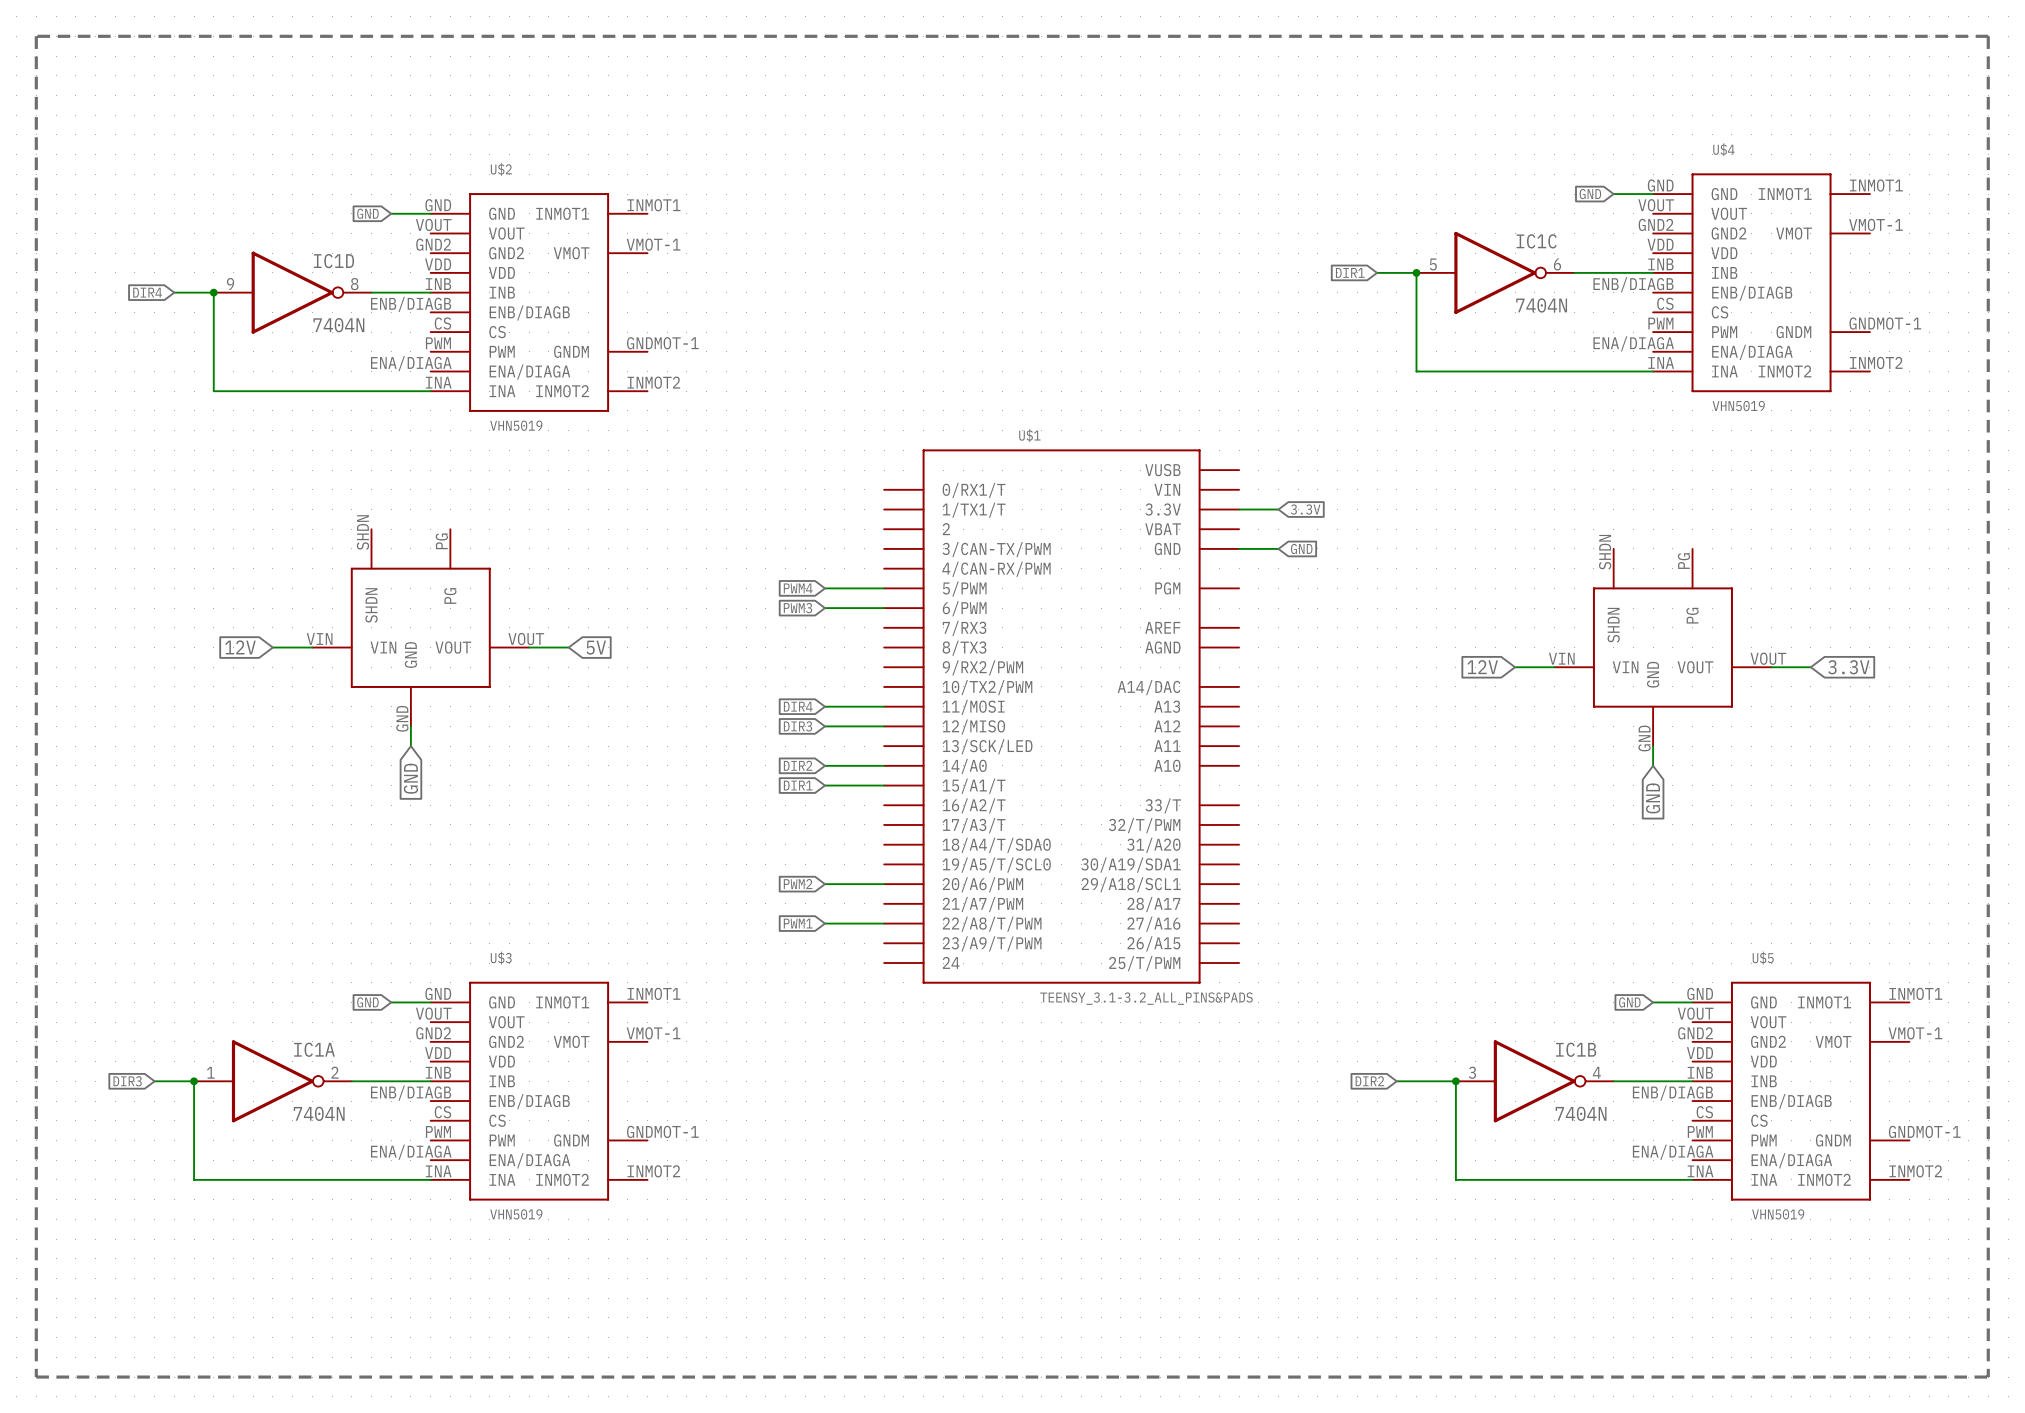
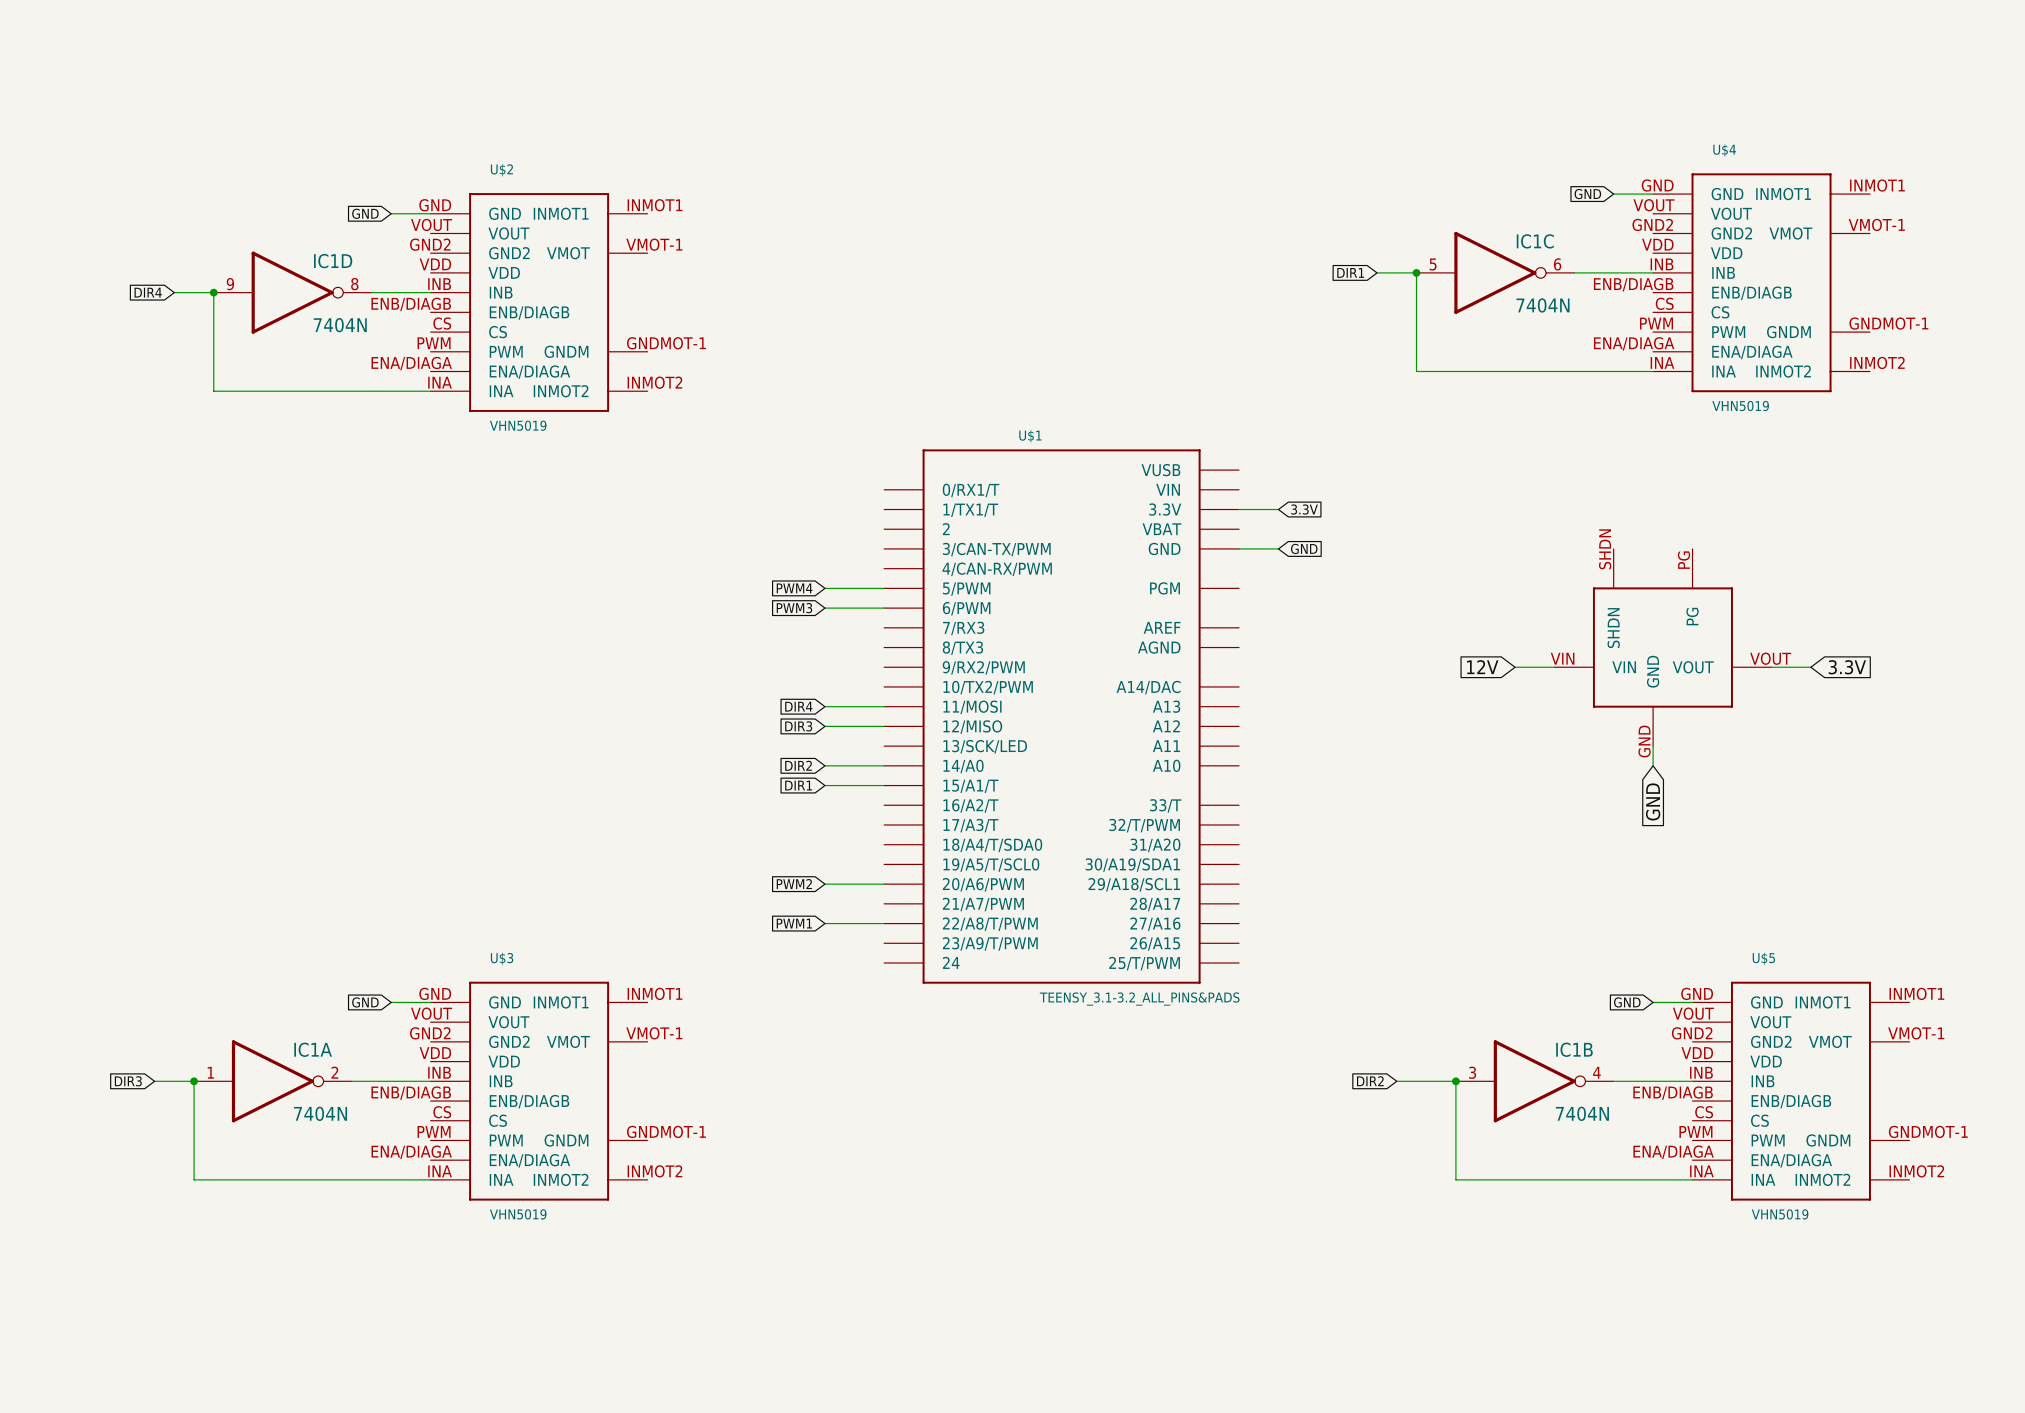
line: (36, 36) (1988, 36) (1988, 1377) (36, 1377) (36, 36) -> none
part: (420, 627) -> none
global label: 12V (240, 647) -> none
wire: (272, 647) (312, 647) -> none
wire: (529, 647) (568, 647) -> none
global label: 5V (596, 647) -> none
wire: (410, 726) (410, 746) -> none
global label: GND (410, 778) -> none

